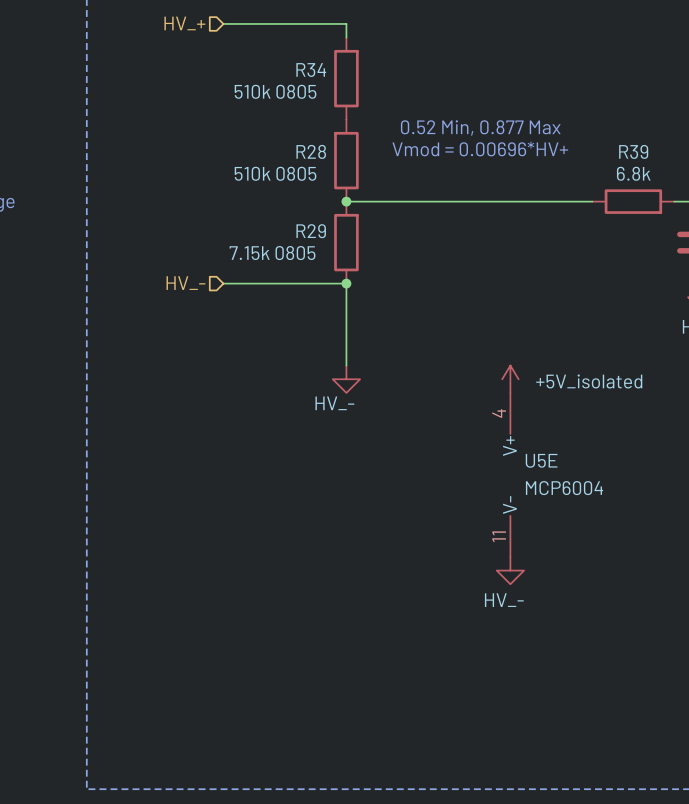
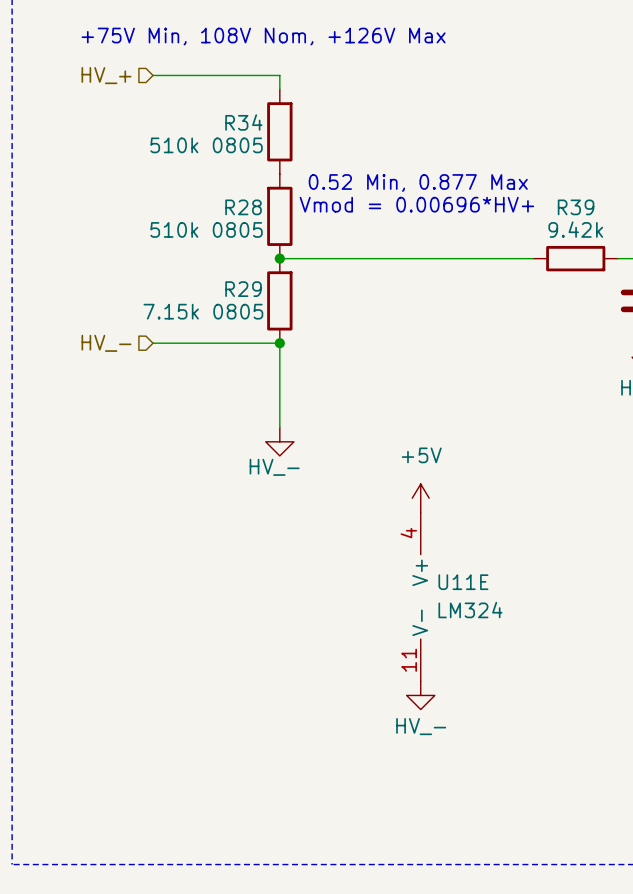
R39 value: 6.8k (633, 173) -> 9.42k (575, 229)
power symbol: +5V_isolated (510, 379) -> none
power symbol: none -> +5V (420, 498)
U5E: MCP6004 (510, 474) -> none
U11E: none -> LM324 (420, 596)
power symbol position: HV_- (510, 570) -> HV_- (420, 695)

